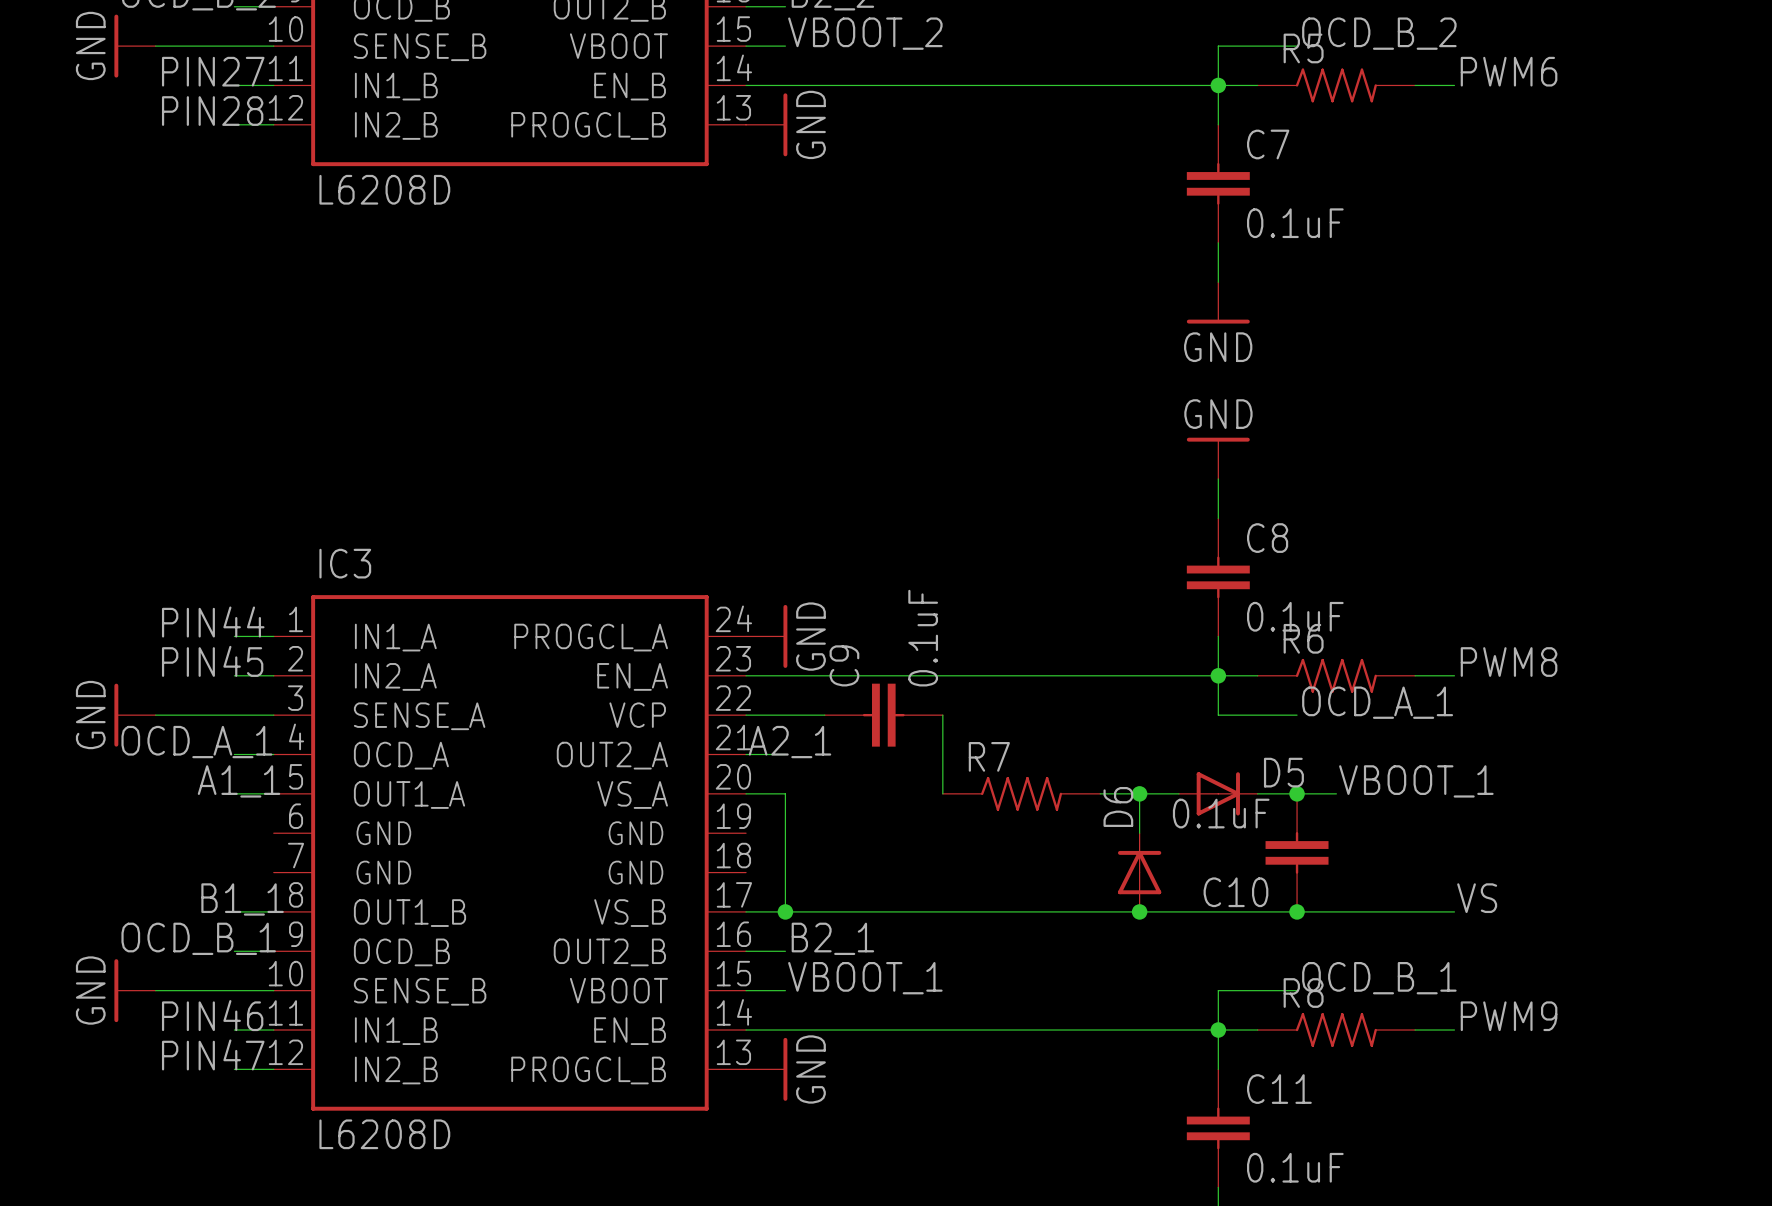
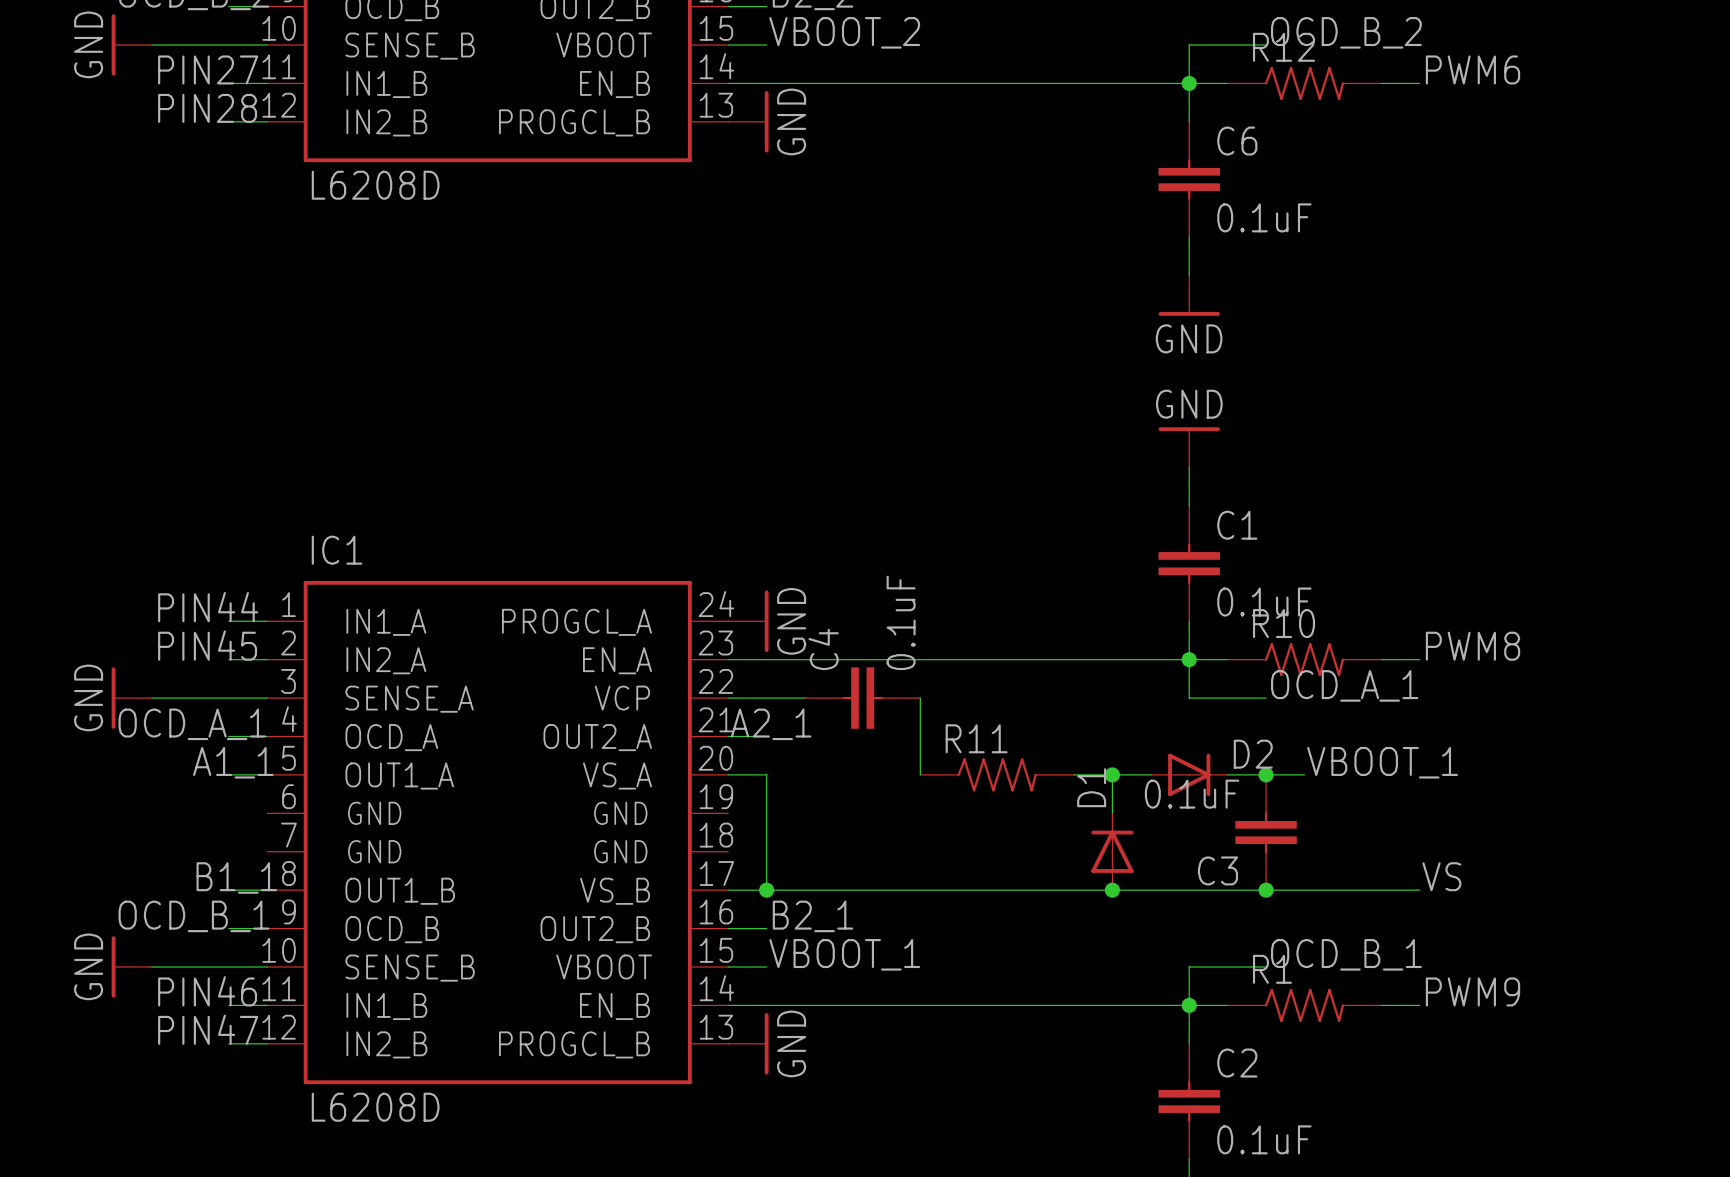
R5 name: R5 (1303, 48) -> R12 (1283, 47)
C7 name: C7 (1268, 144) -> C6 (1237, 141)
C8 name: C8 (1267, 538) -> C1 (1237, 525)
IC3 name: IC3 (345, 563) -> IC1 (337, 550)
R6 name: R6 (1303, 638) -> R10 (1283, 623)
C9 name: C9 (844, 665) -> C4 (823, 649)
R7 name: R7 (989, 756) -> R11 (976, 738)
D5 name: D5 (1283, 772) -> D2 (1253, 754)
D6 name: D6 (1118, 806) -> D1 (1091, 787)
C10 name: C10 (1235, 892) -> C3 (1217, 870)
R8 name: R8 (1303, 993) -> R1 (1272, 969)
C11 name: C11 (1279, 1089) -> C2 (1237, 1063)

